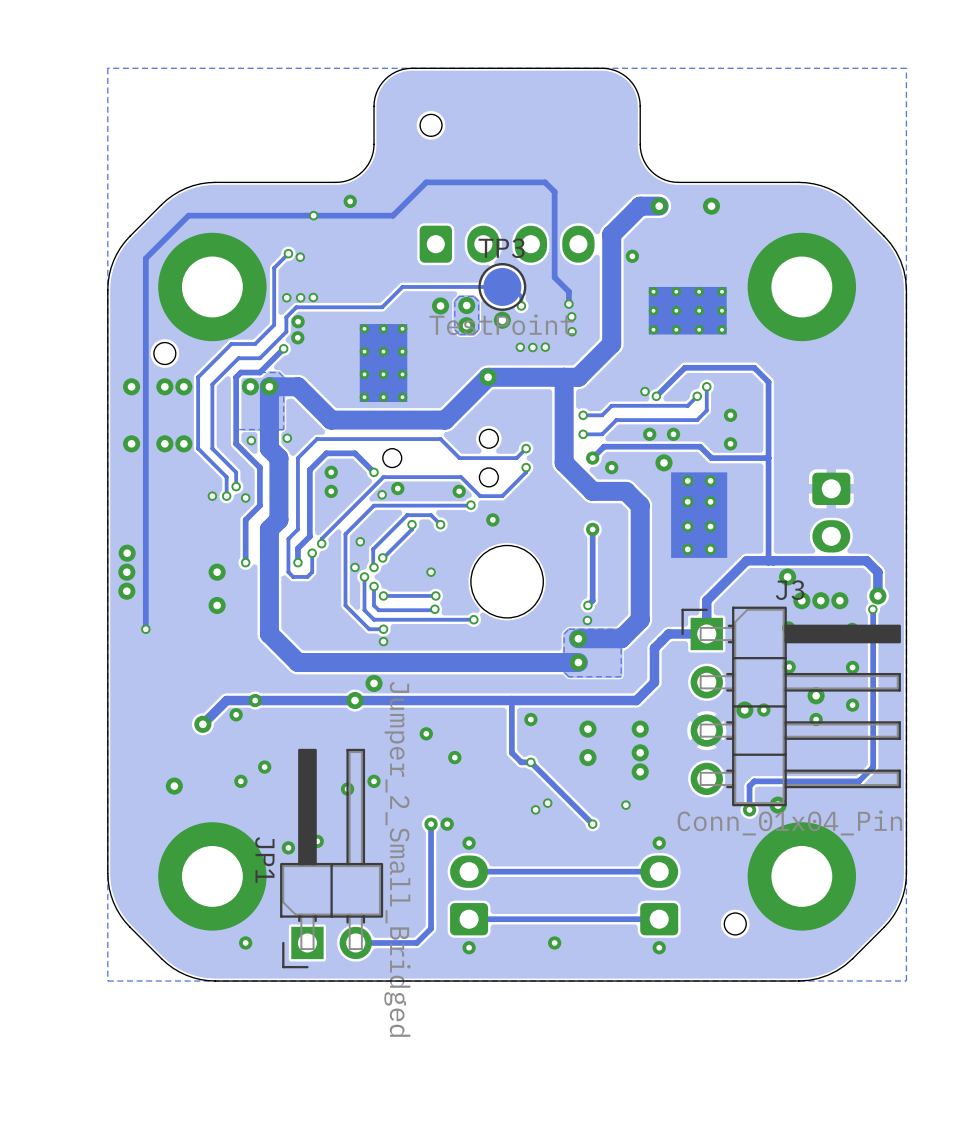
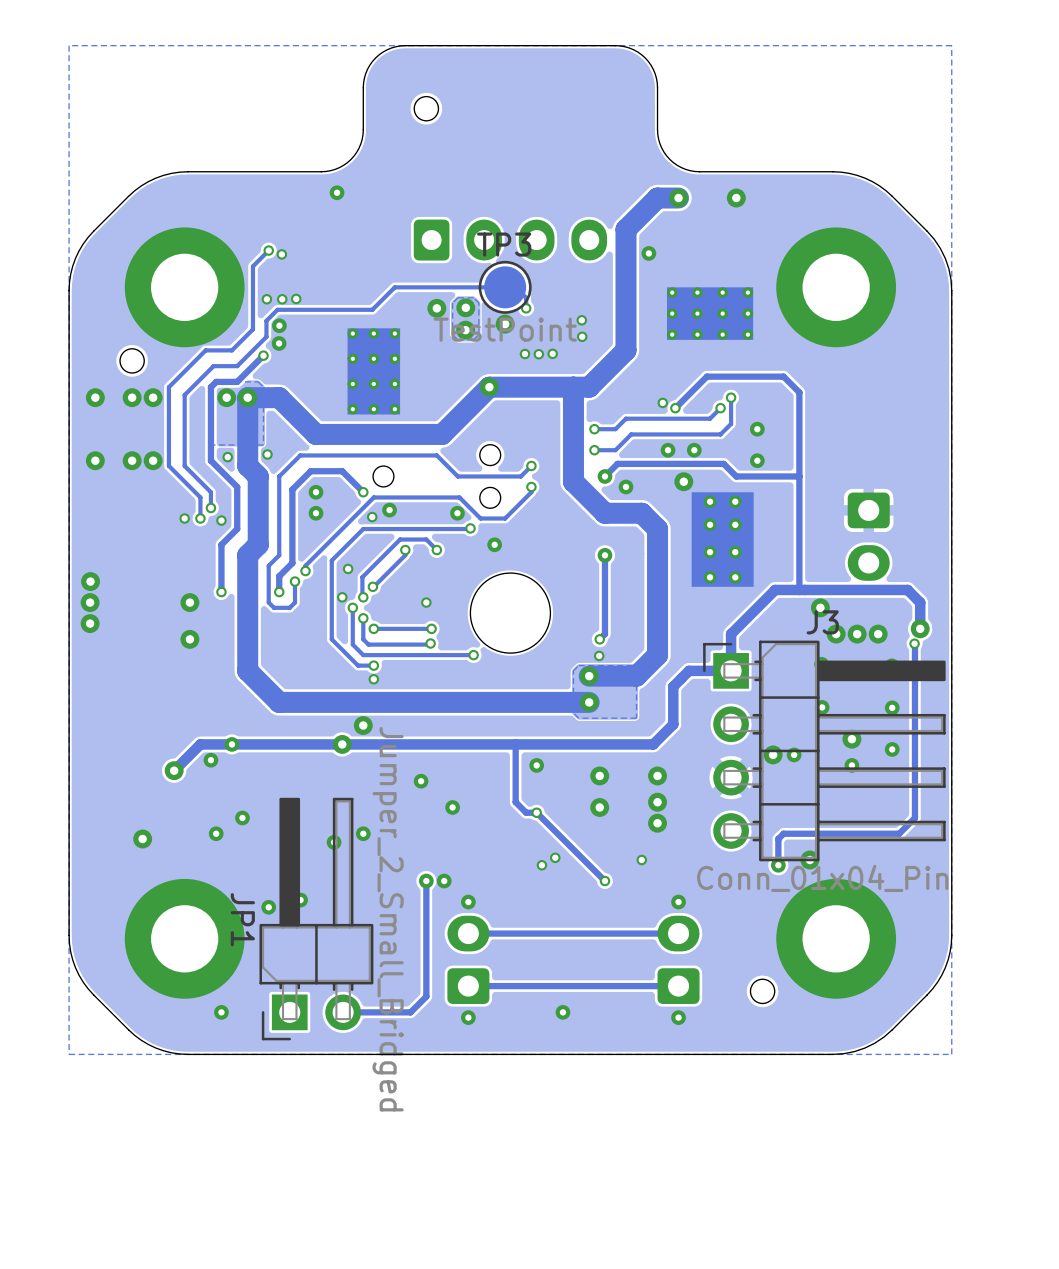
via: (313, 215) -> none
track: (568, 304) (568, 291) (554, 277) (554, 191) (545, 182) (426, 182) (393, 215) (188, 215) (145, 258) (145, 629) -> none
via: (568, 304) -> none
via: (145, 629) -> none

